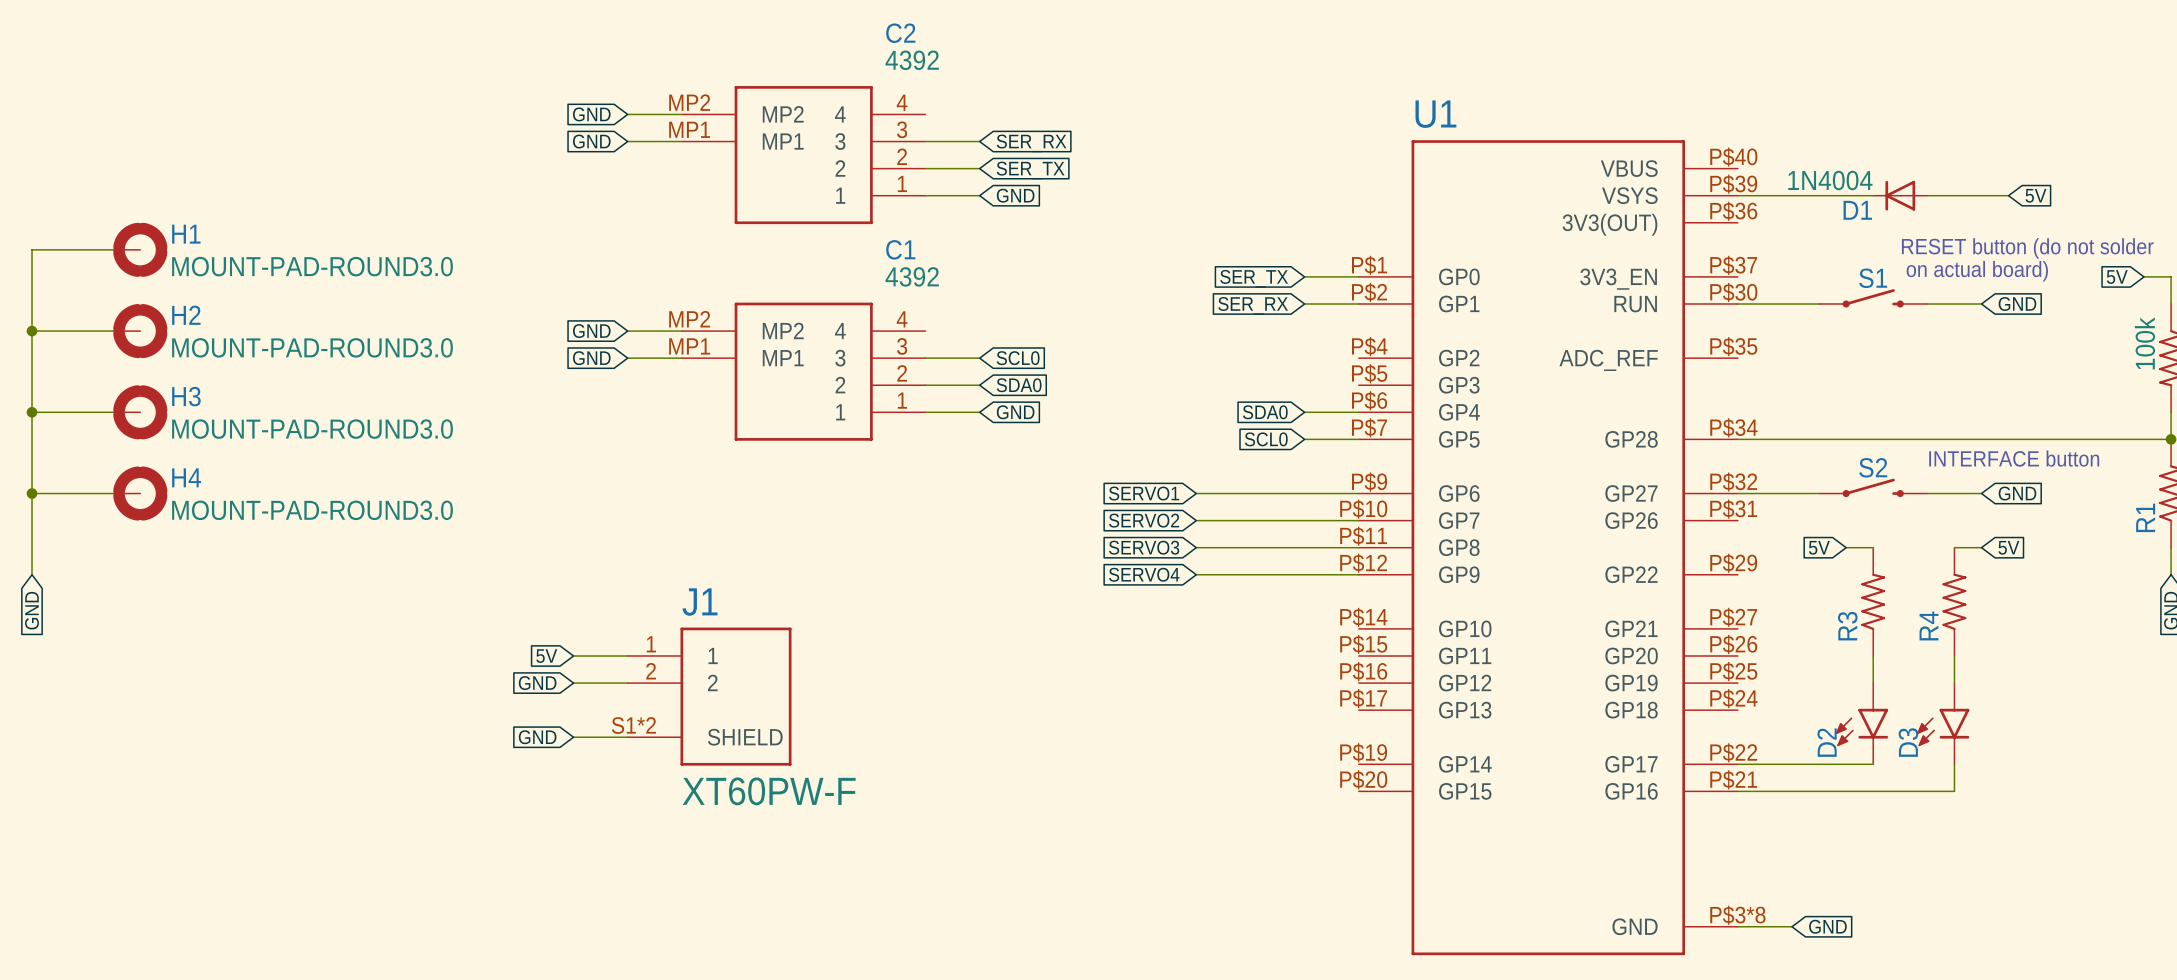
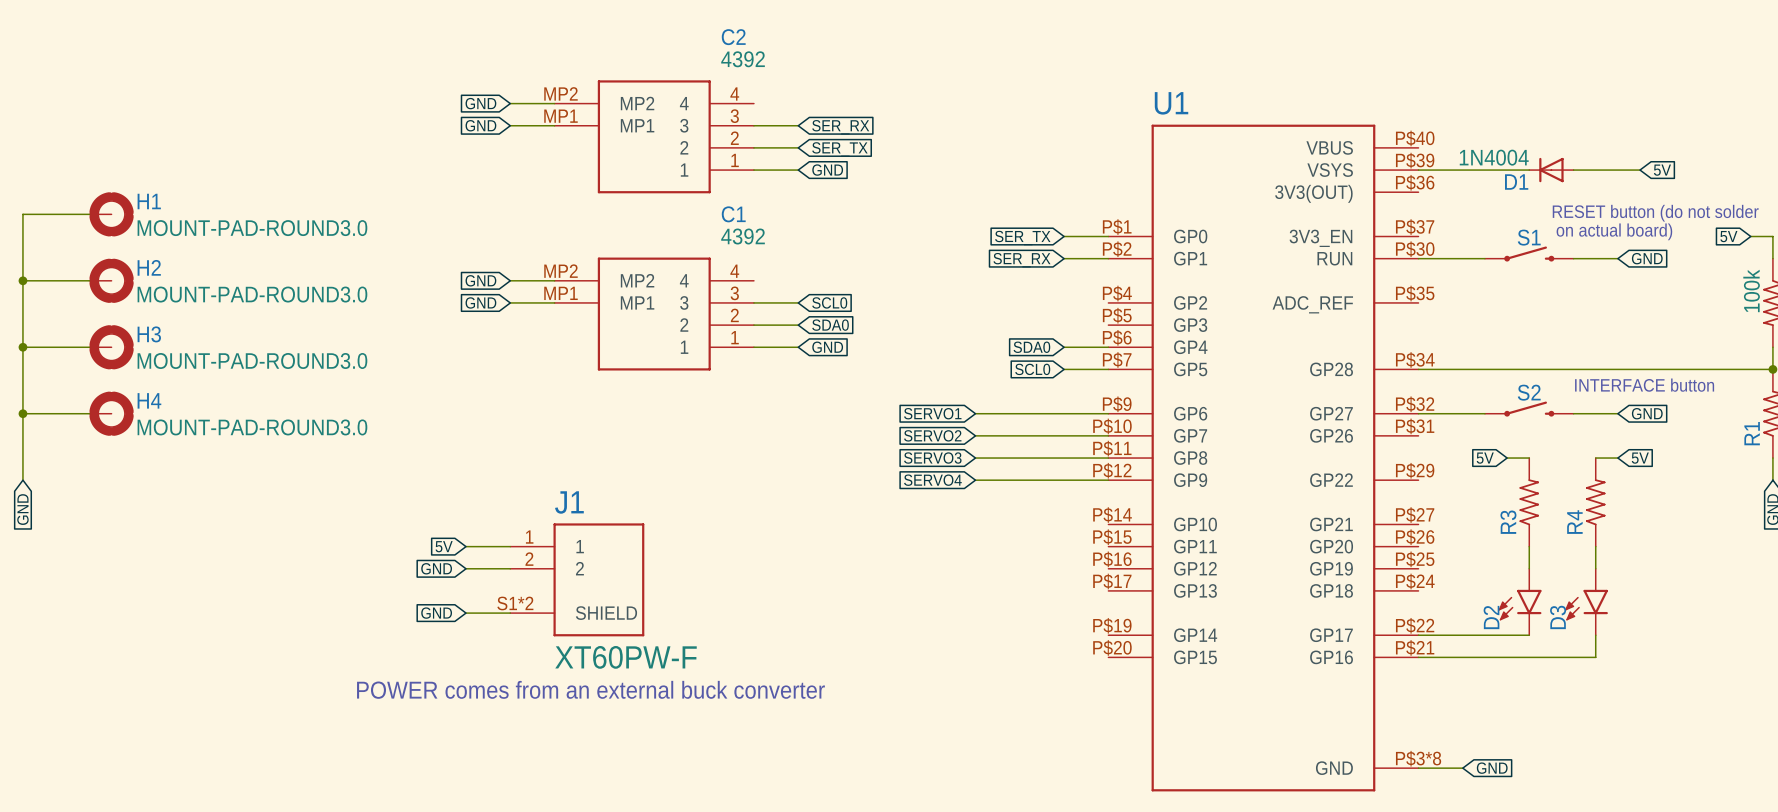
text: none -> POWER comes from an external buck converter (590, 689)

